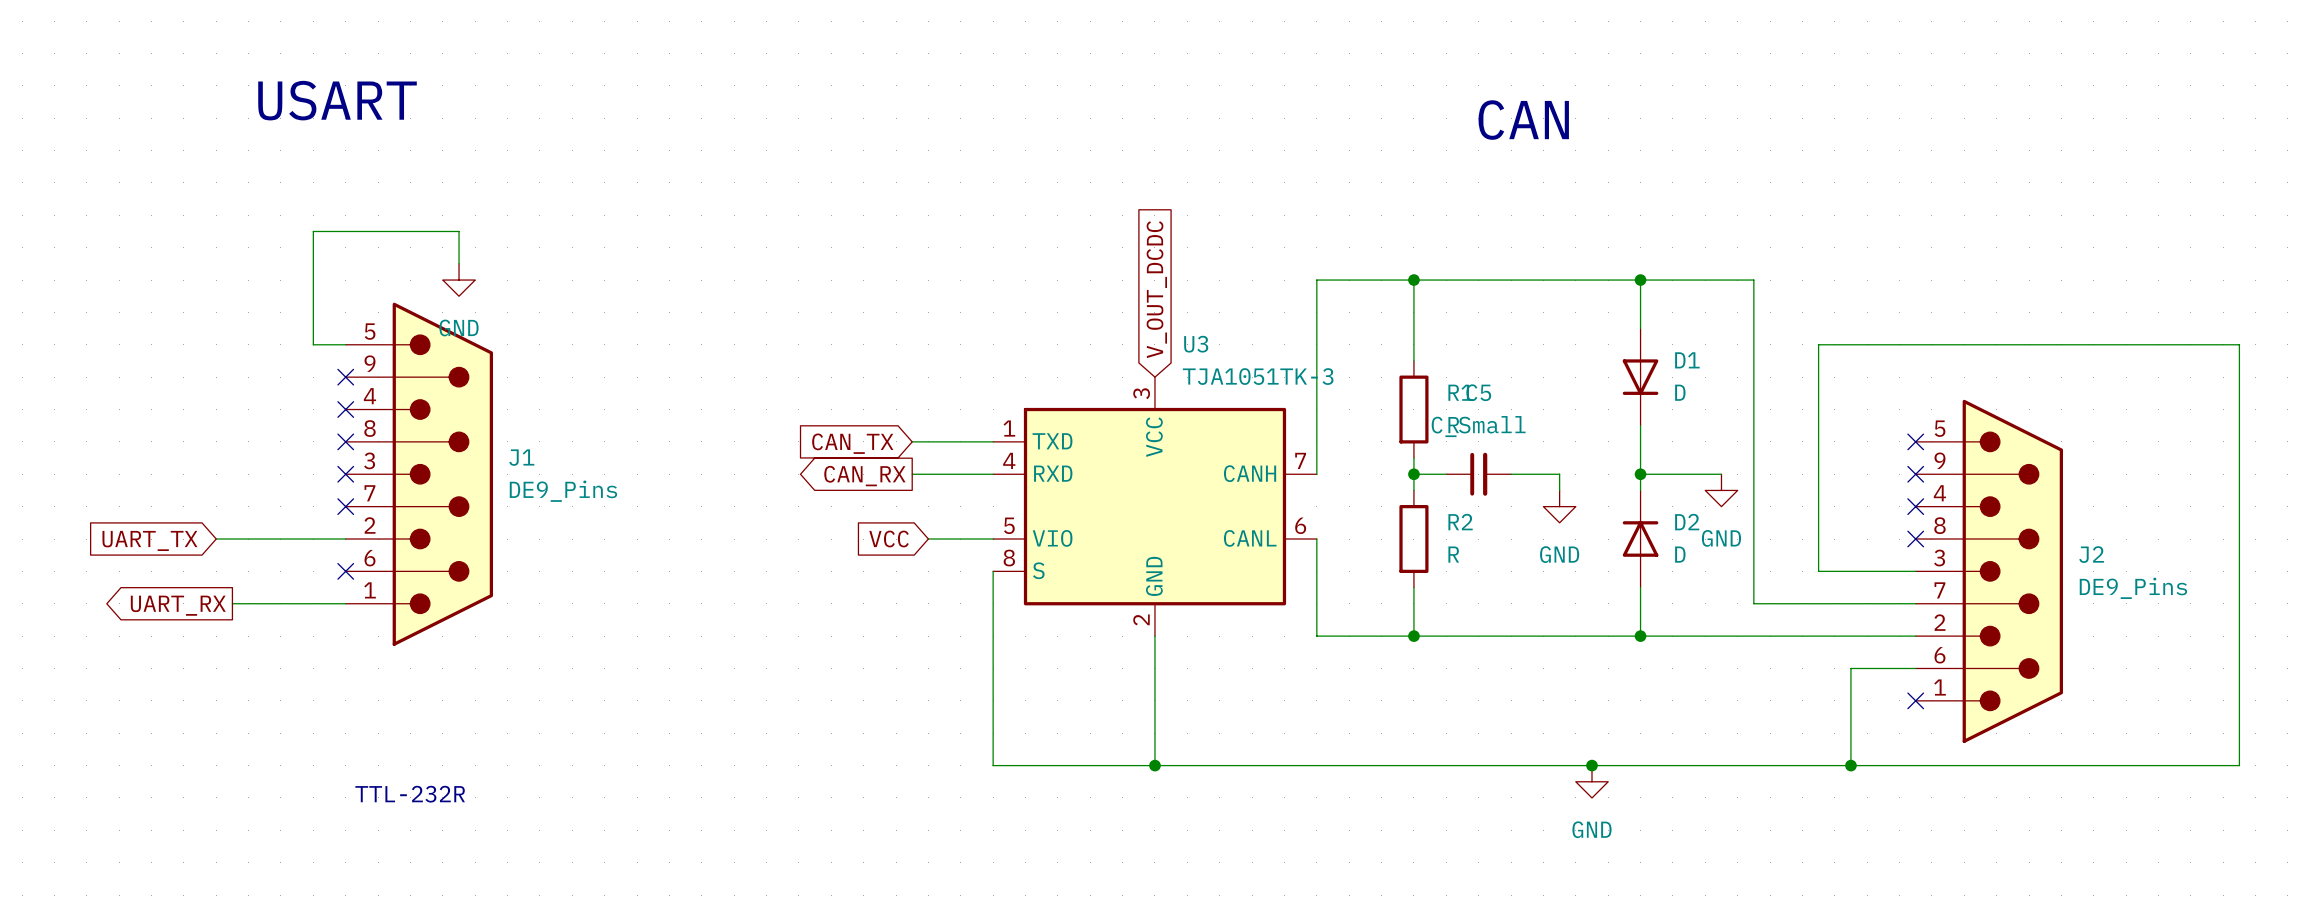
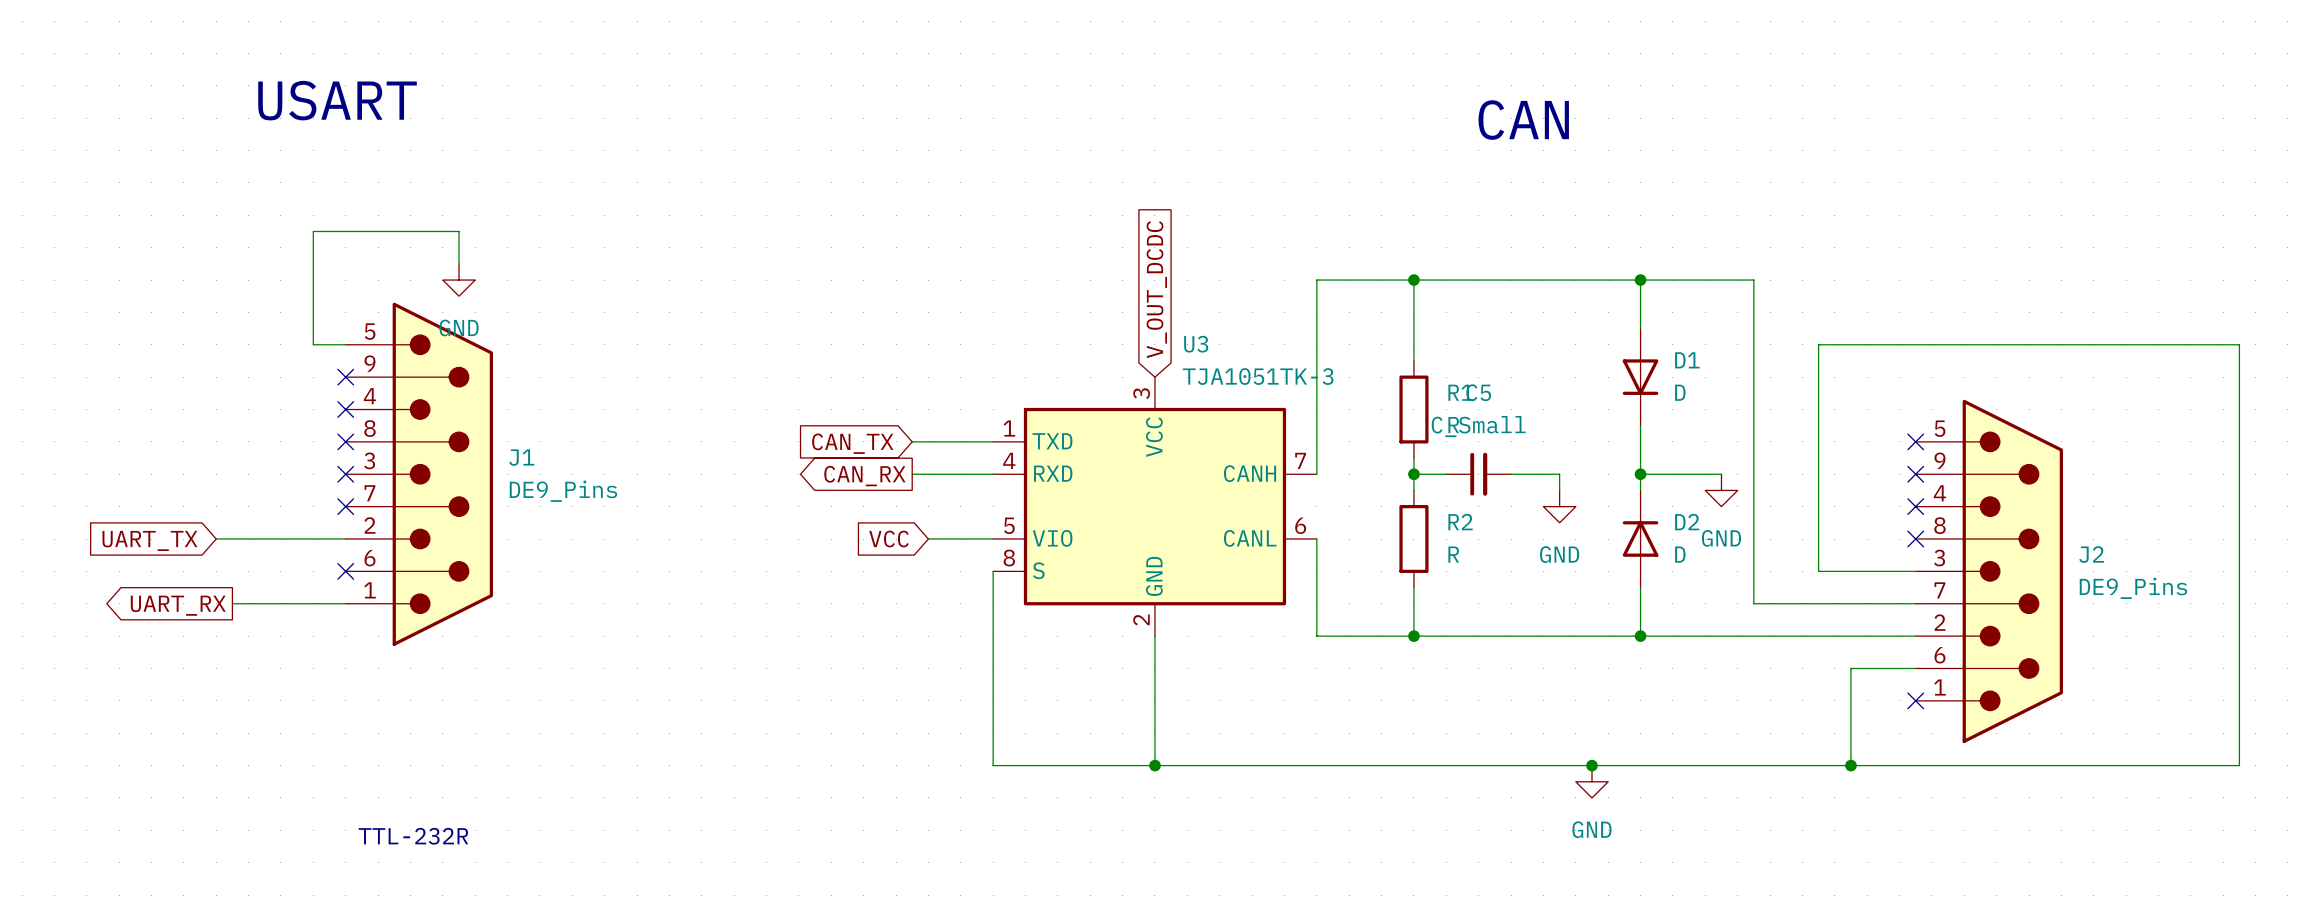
text position: TTL-232R (410, 794) -> TTL-232R (413, 836)

